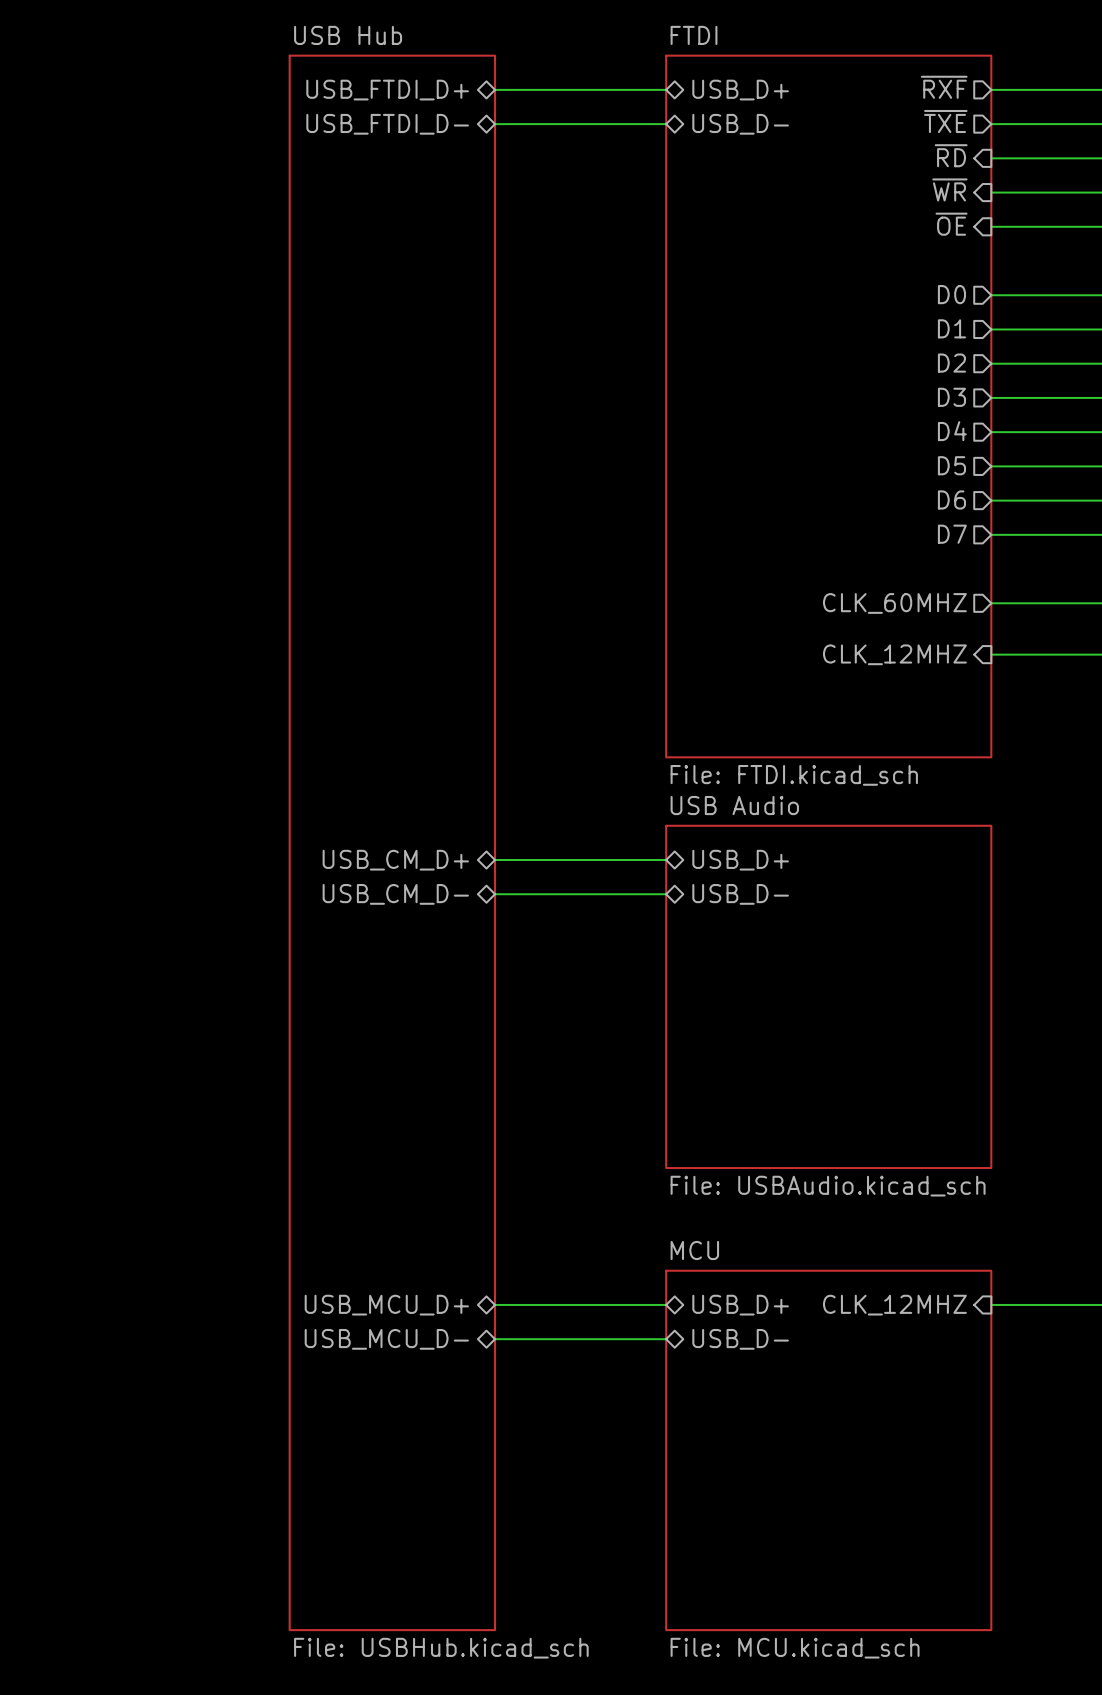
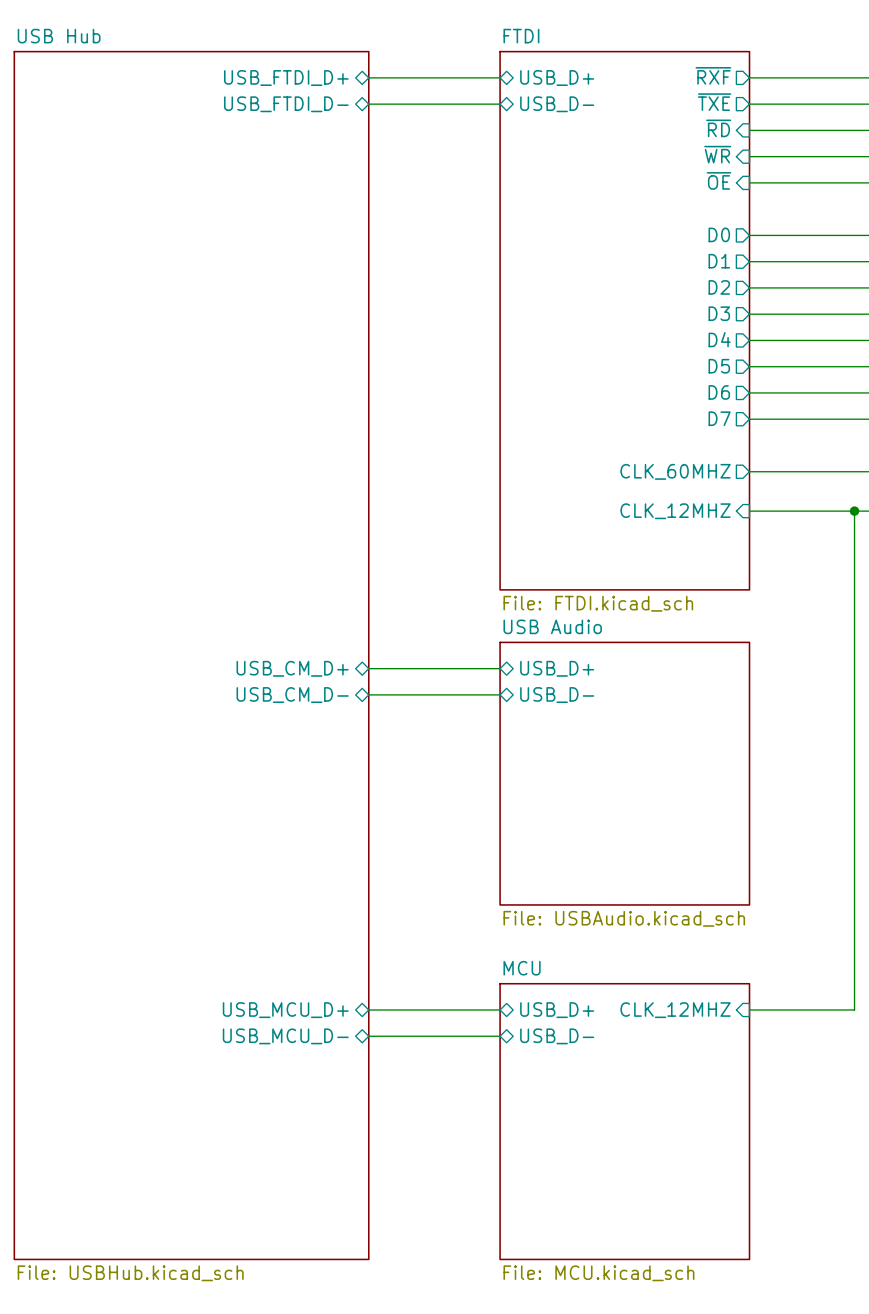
sheet USB Hub: none -> File: USBHub.kicad_sch (191, 655)
sheet USB Hub: File: USBHub.kicad_sch (392, 842) -> none

